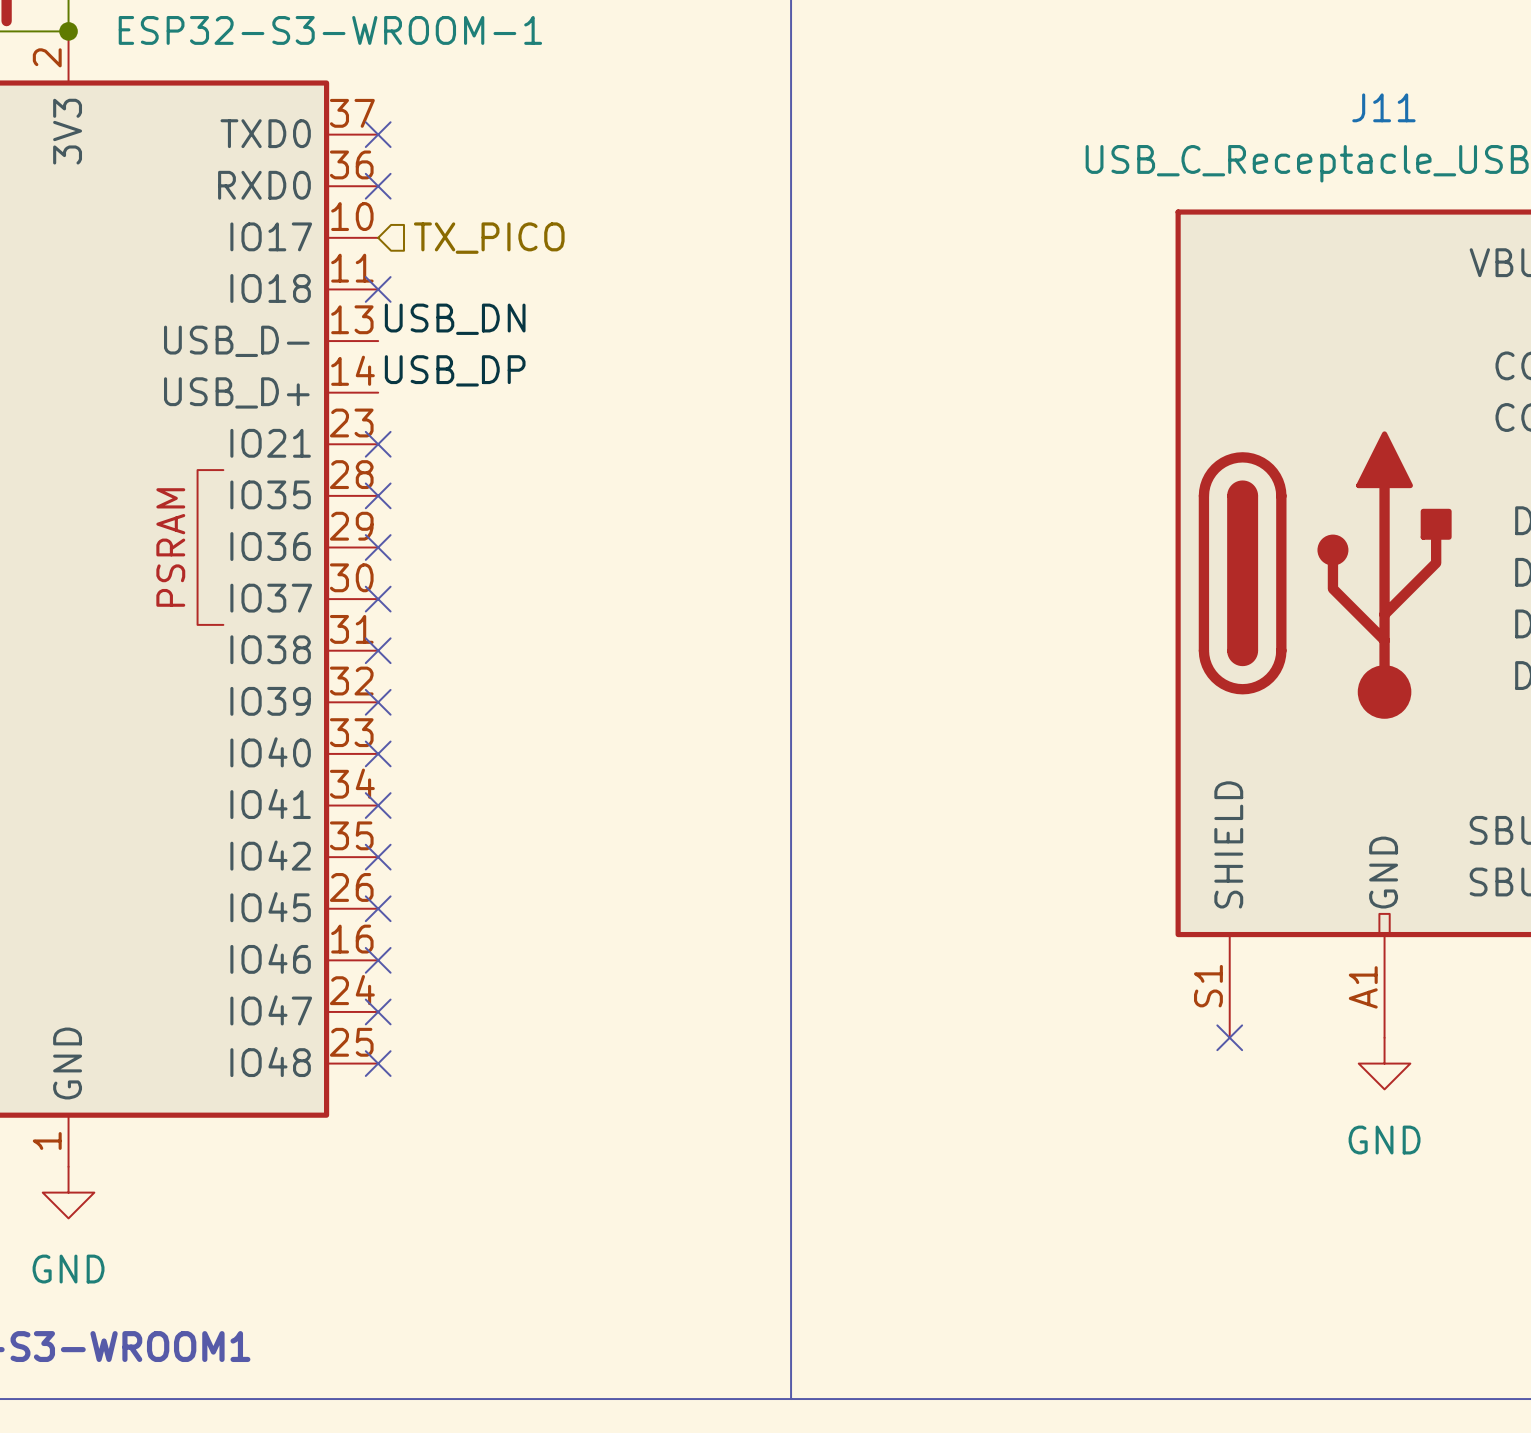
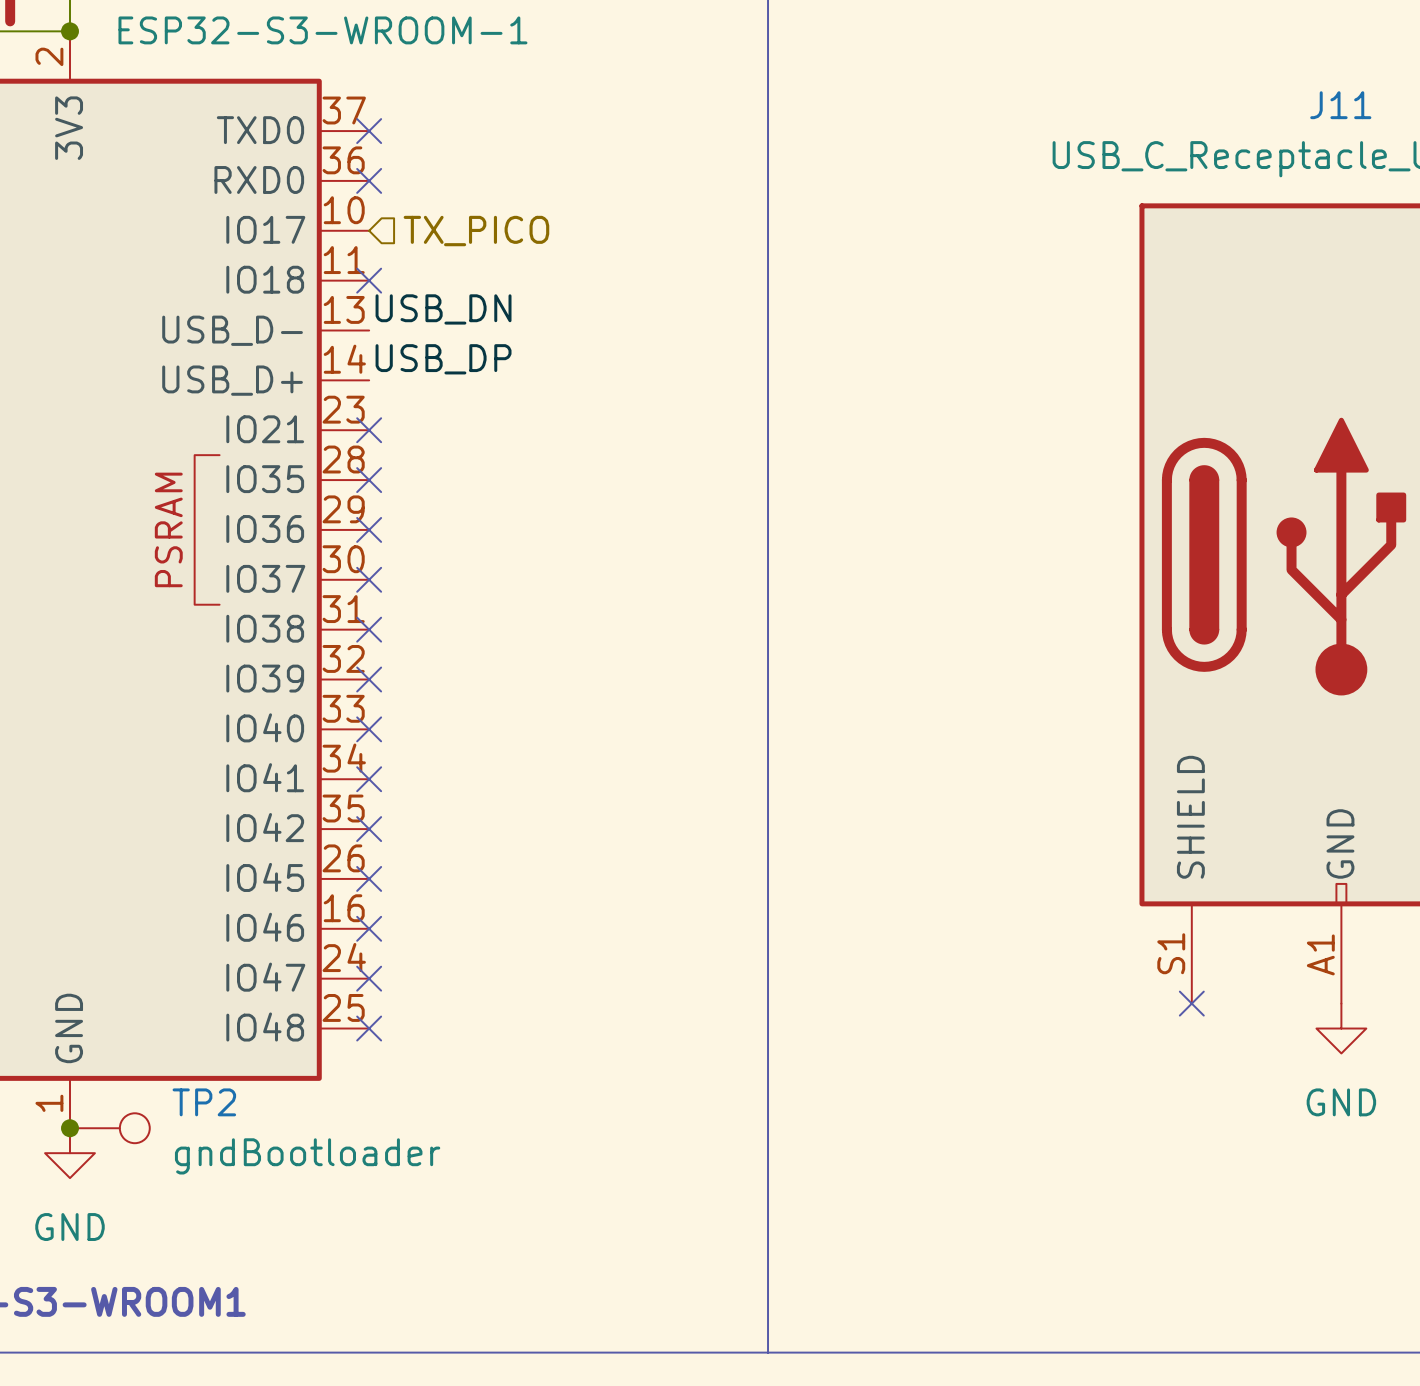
junction: none -> (69, 1128)
TP2: none -> gndBootloader (109, 1128)

